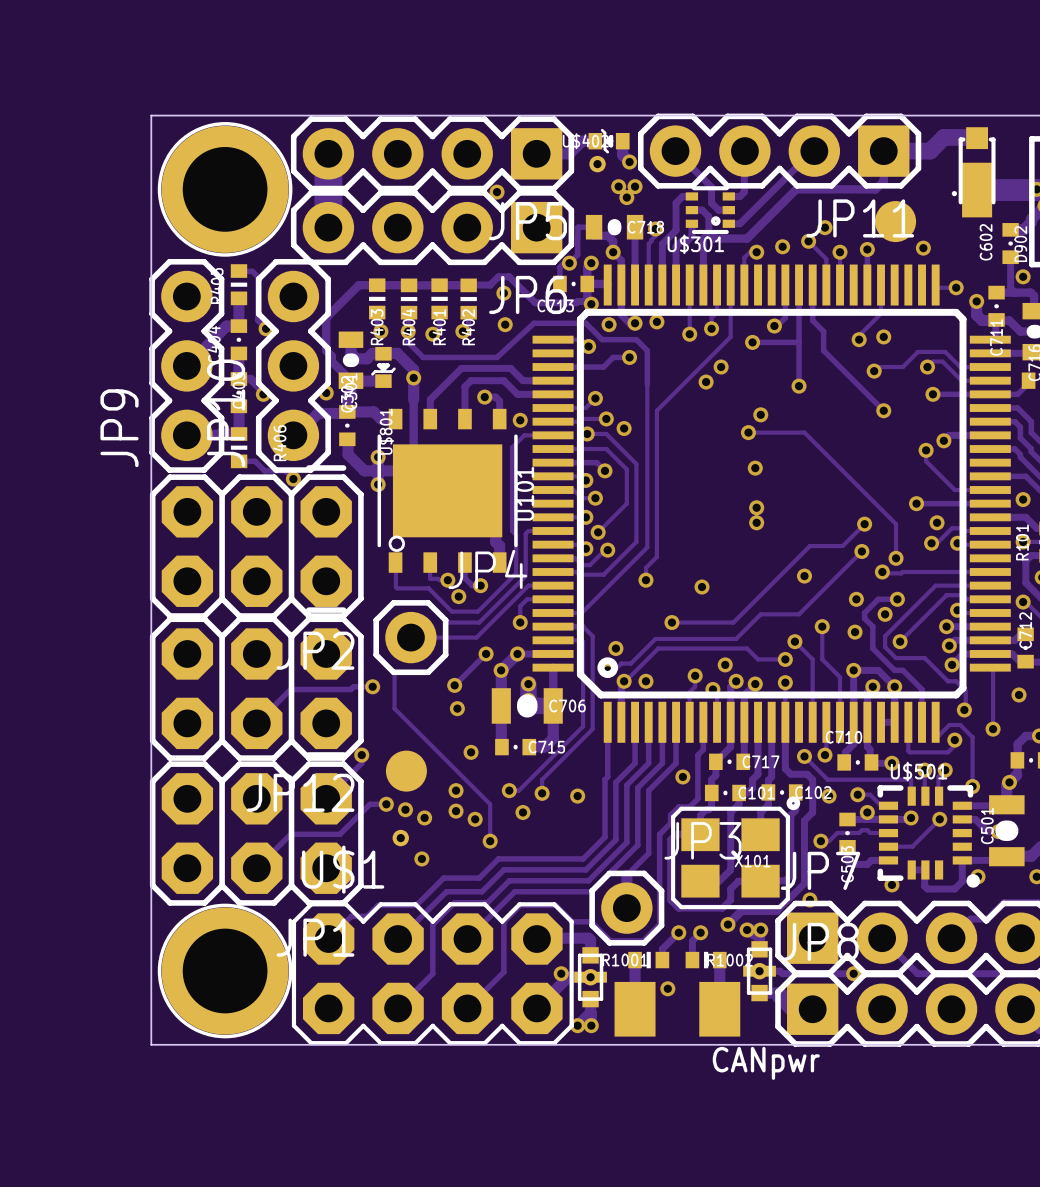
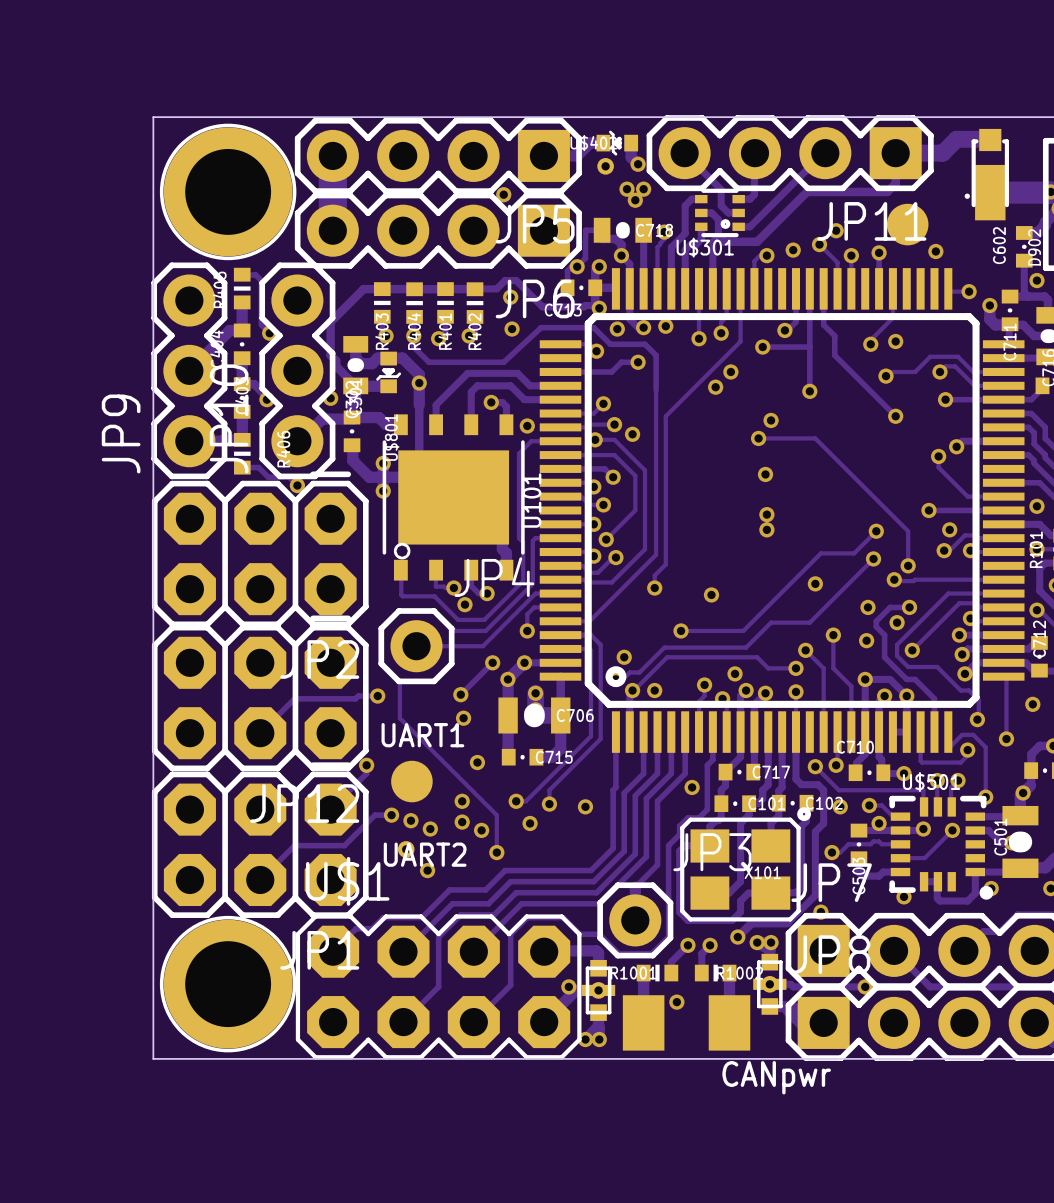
text: none -> UART1 (422, 735)
text: none -> UART2 (425, 854)

